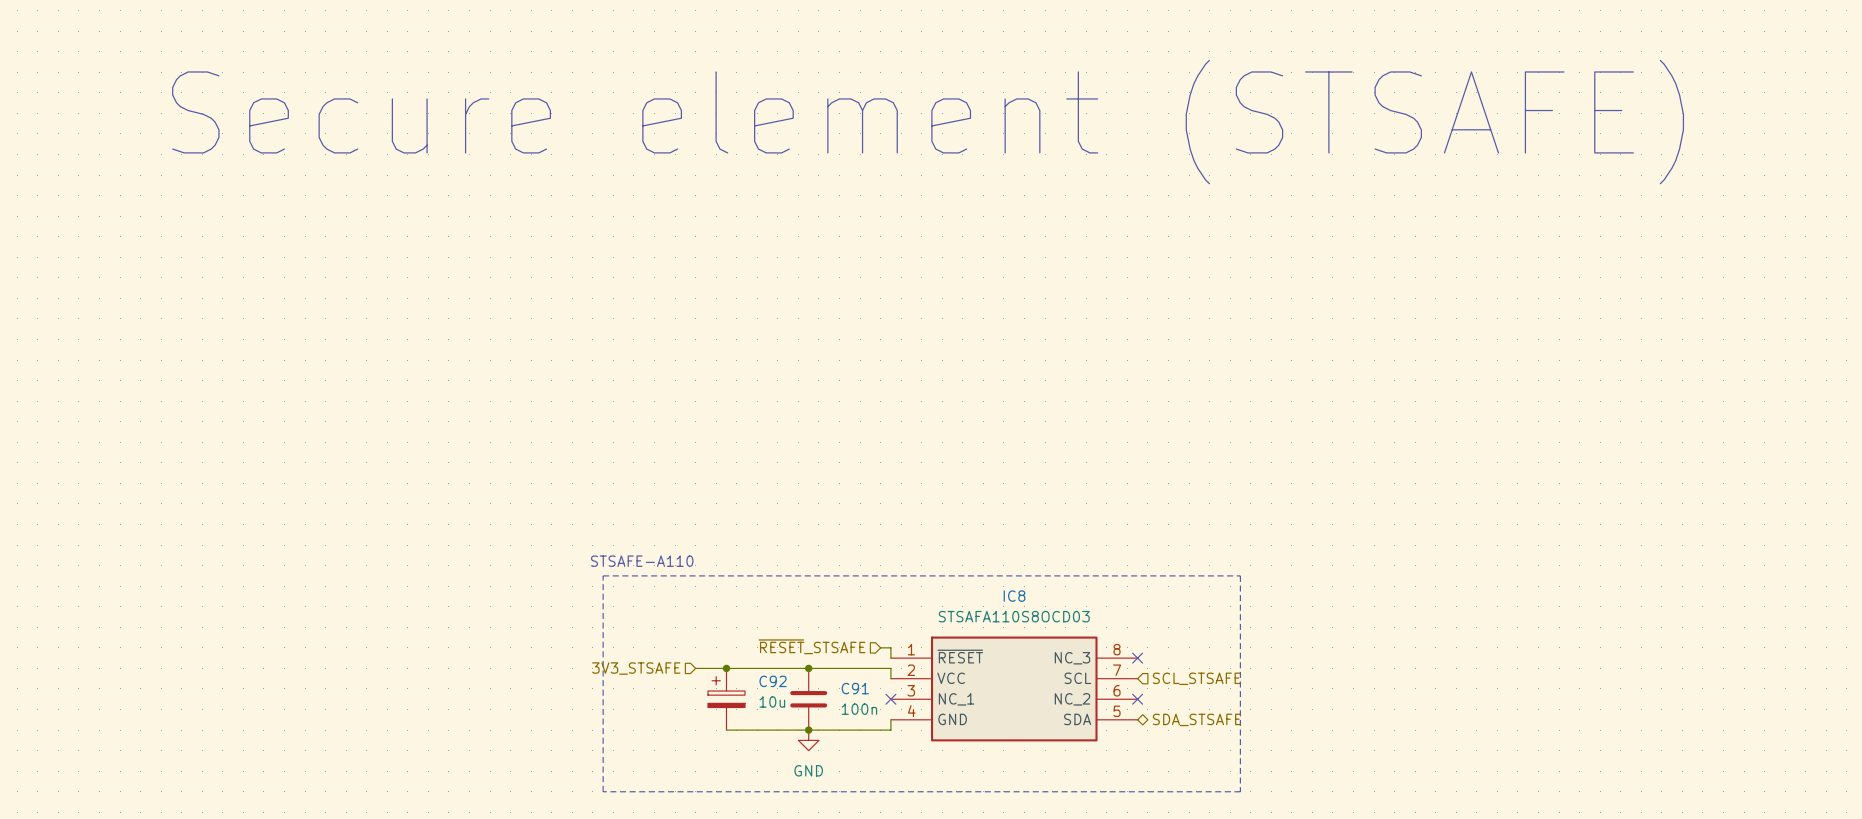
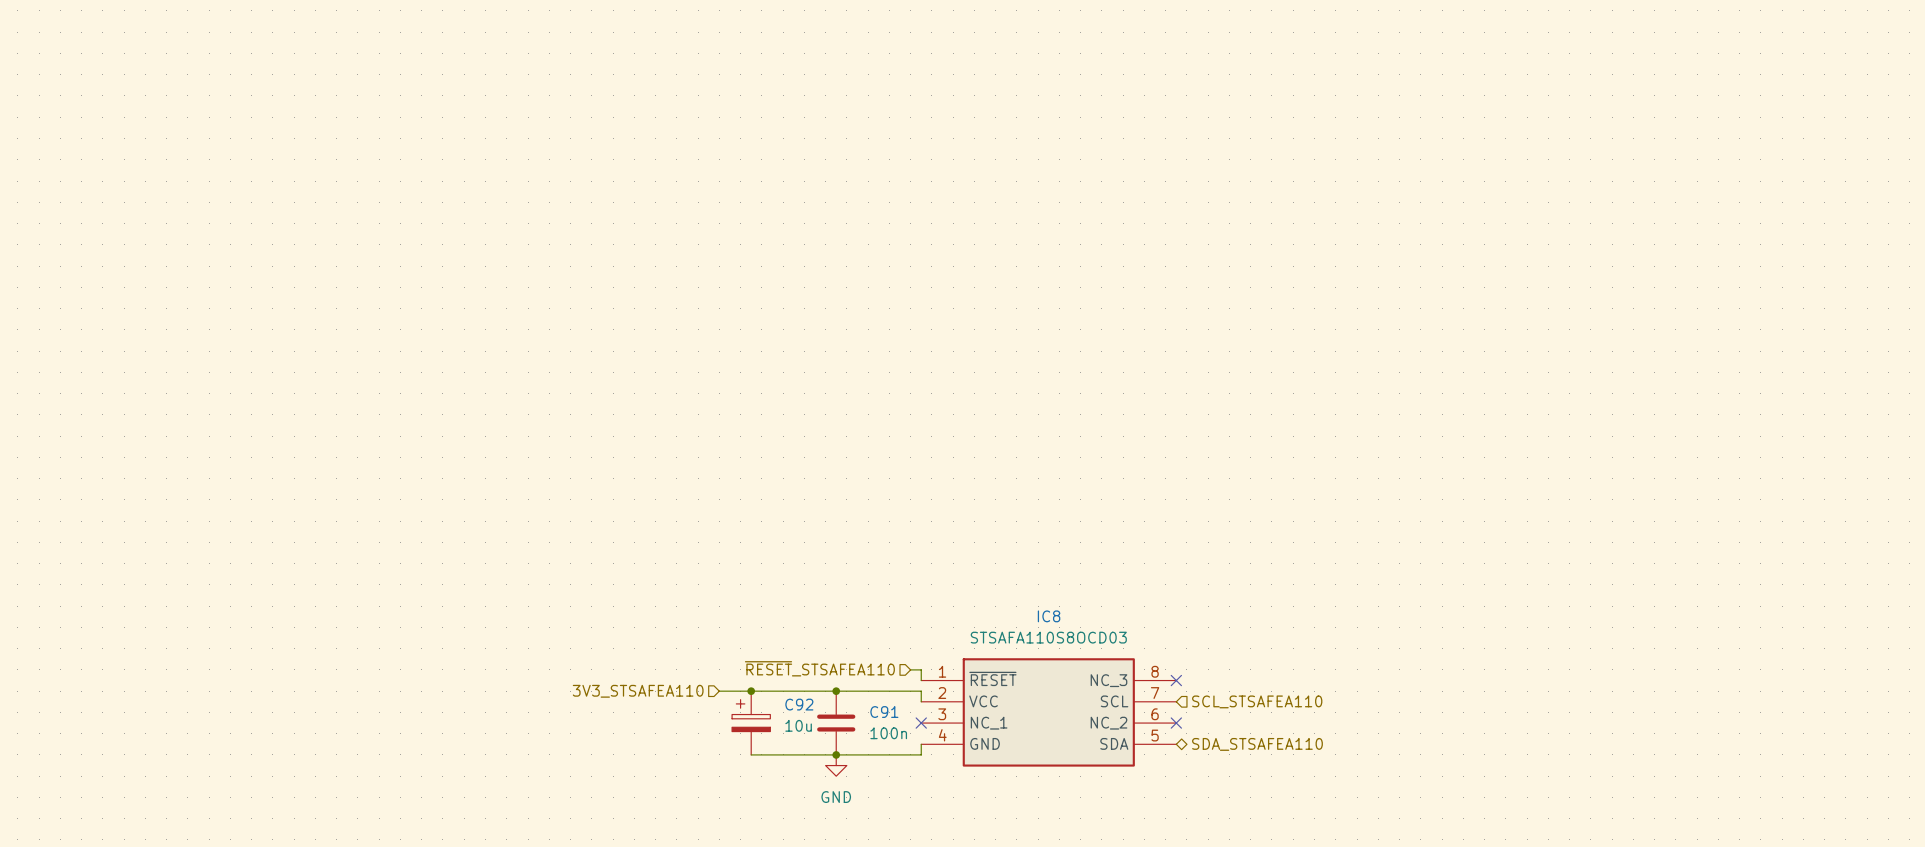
text: Secure element (STSAFE) (928, 122) -> none
text: STSAFE-A110 (642, 561) -> none
line: (603, 575) (1240, 575) (1240, 791) (603, 791) (603, 575) -> none
hierarchical label: ~{RESET}_STSAFE (811, 646) -> ~{RESET}_STSAFEA110 (819, 668)
hierarchical label: 3V3_STSAFE (636, 668) -> 3V3_STSAFEA110 (638, 691)
hierarchical label: SCL_STSAFE (1196, 678) -> SCL_STSAFEA110 (1257, 701)
hierarchical label: SDA_STSAFE (1196, 719) -> SDA_STSAFEA110 (1257, 744)

